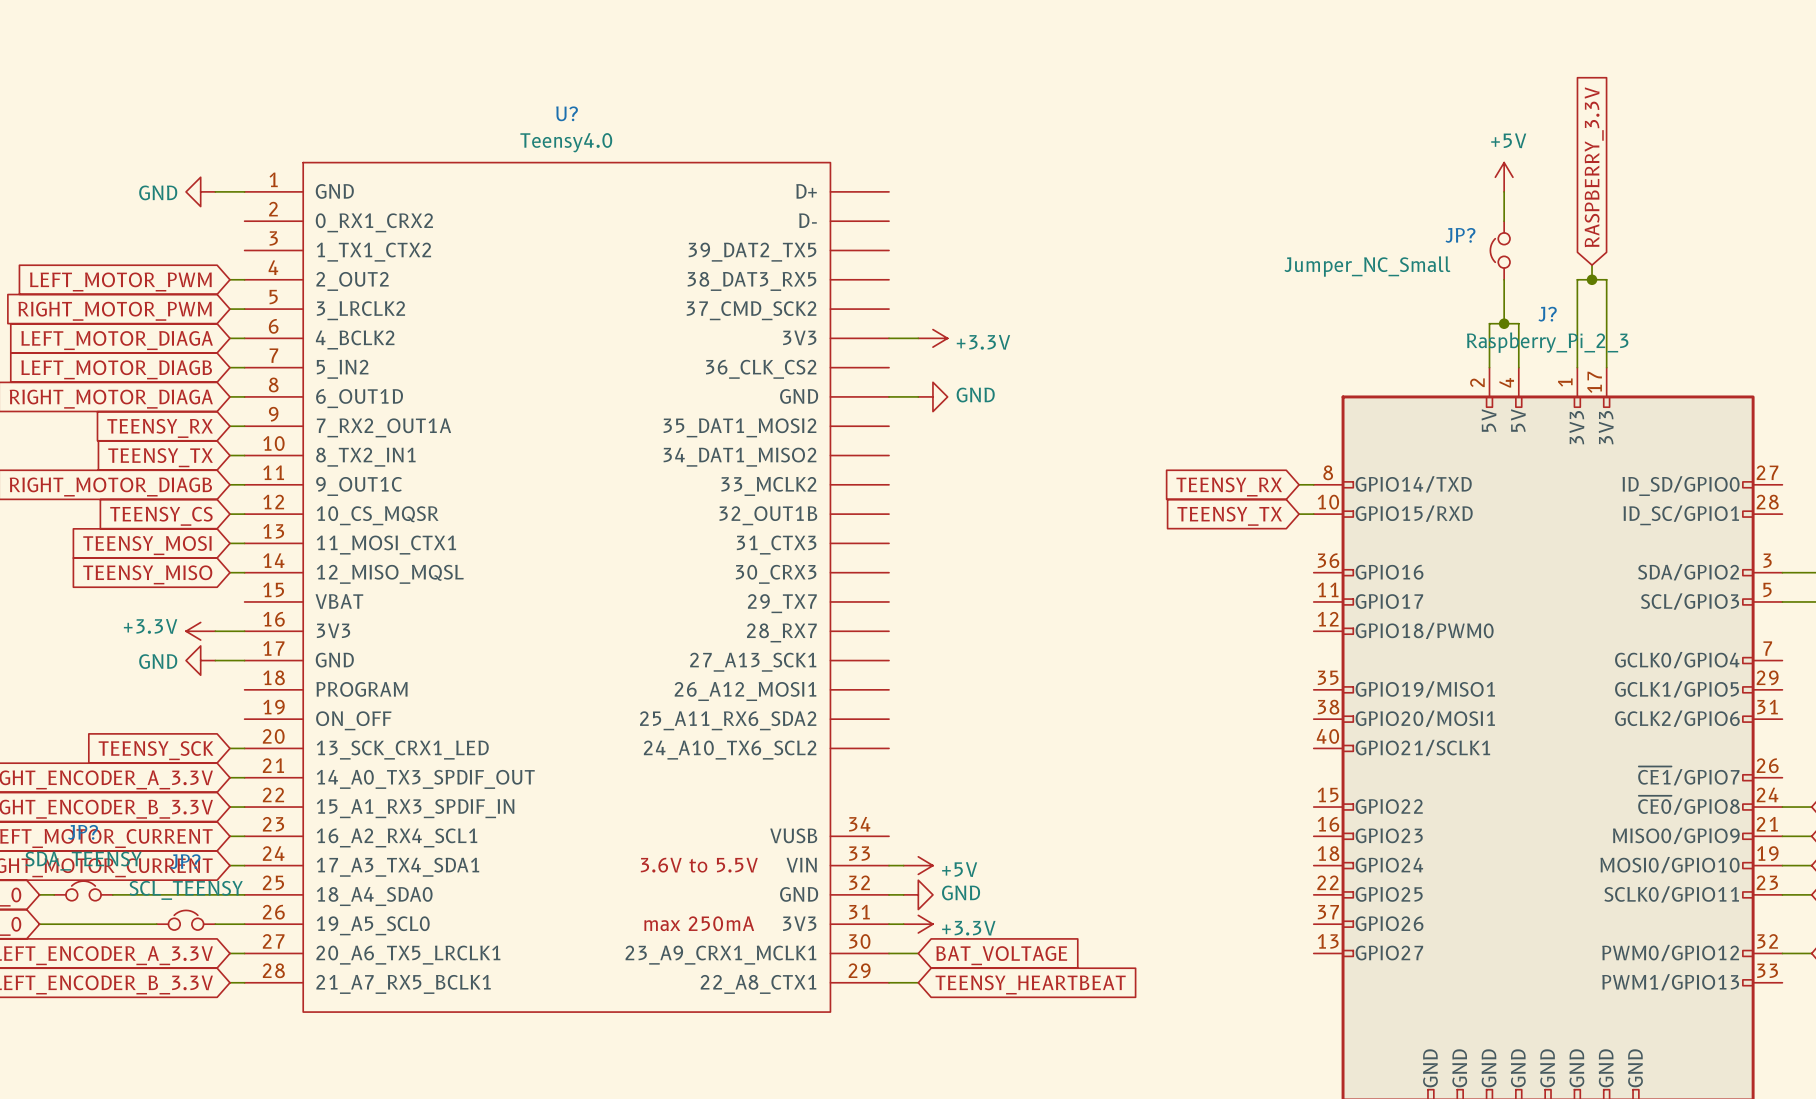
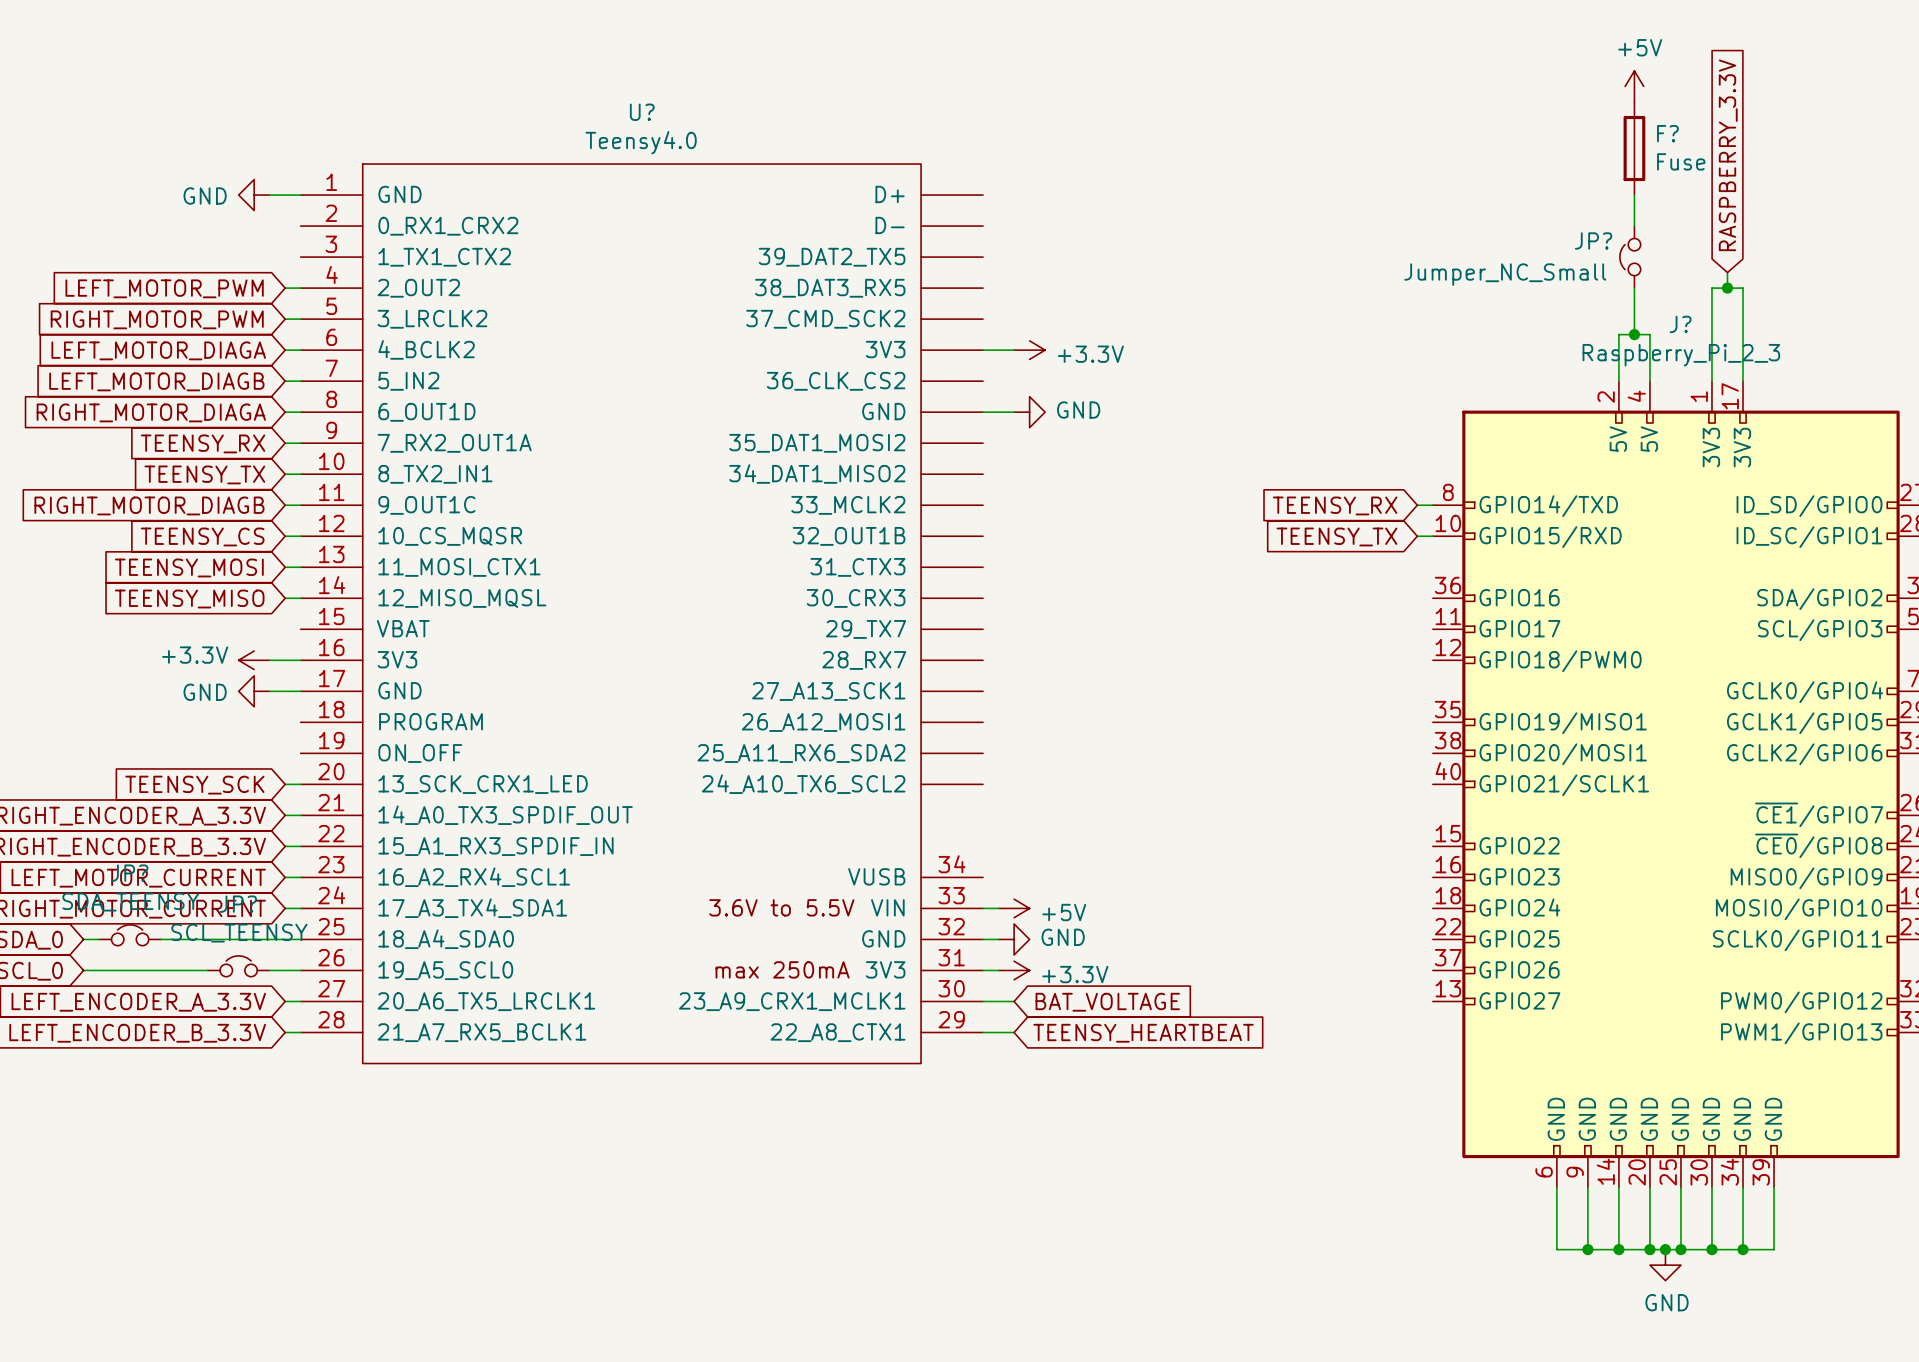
F?: none -> Fuse (1634, 148)
power symbol position: +5V (1504, 177) -> +5V (1634, 86)

